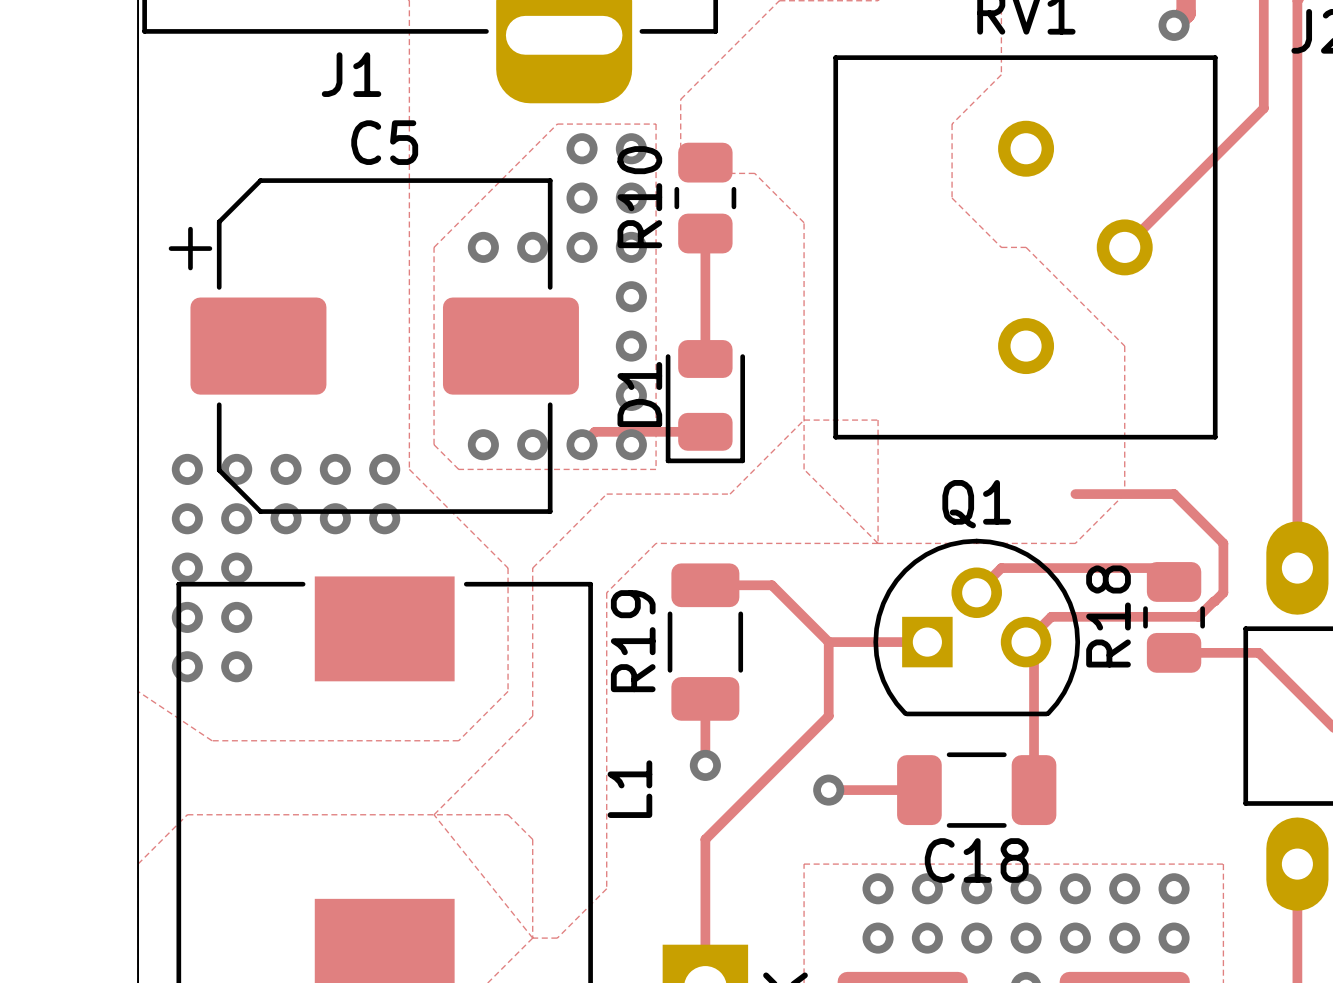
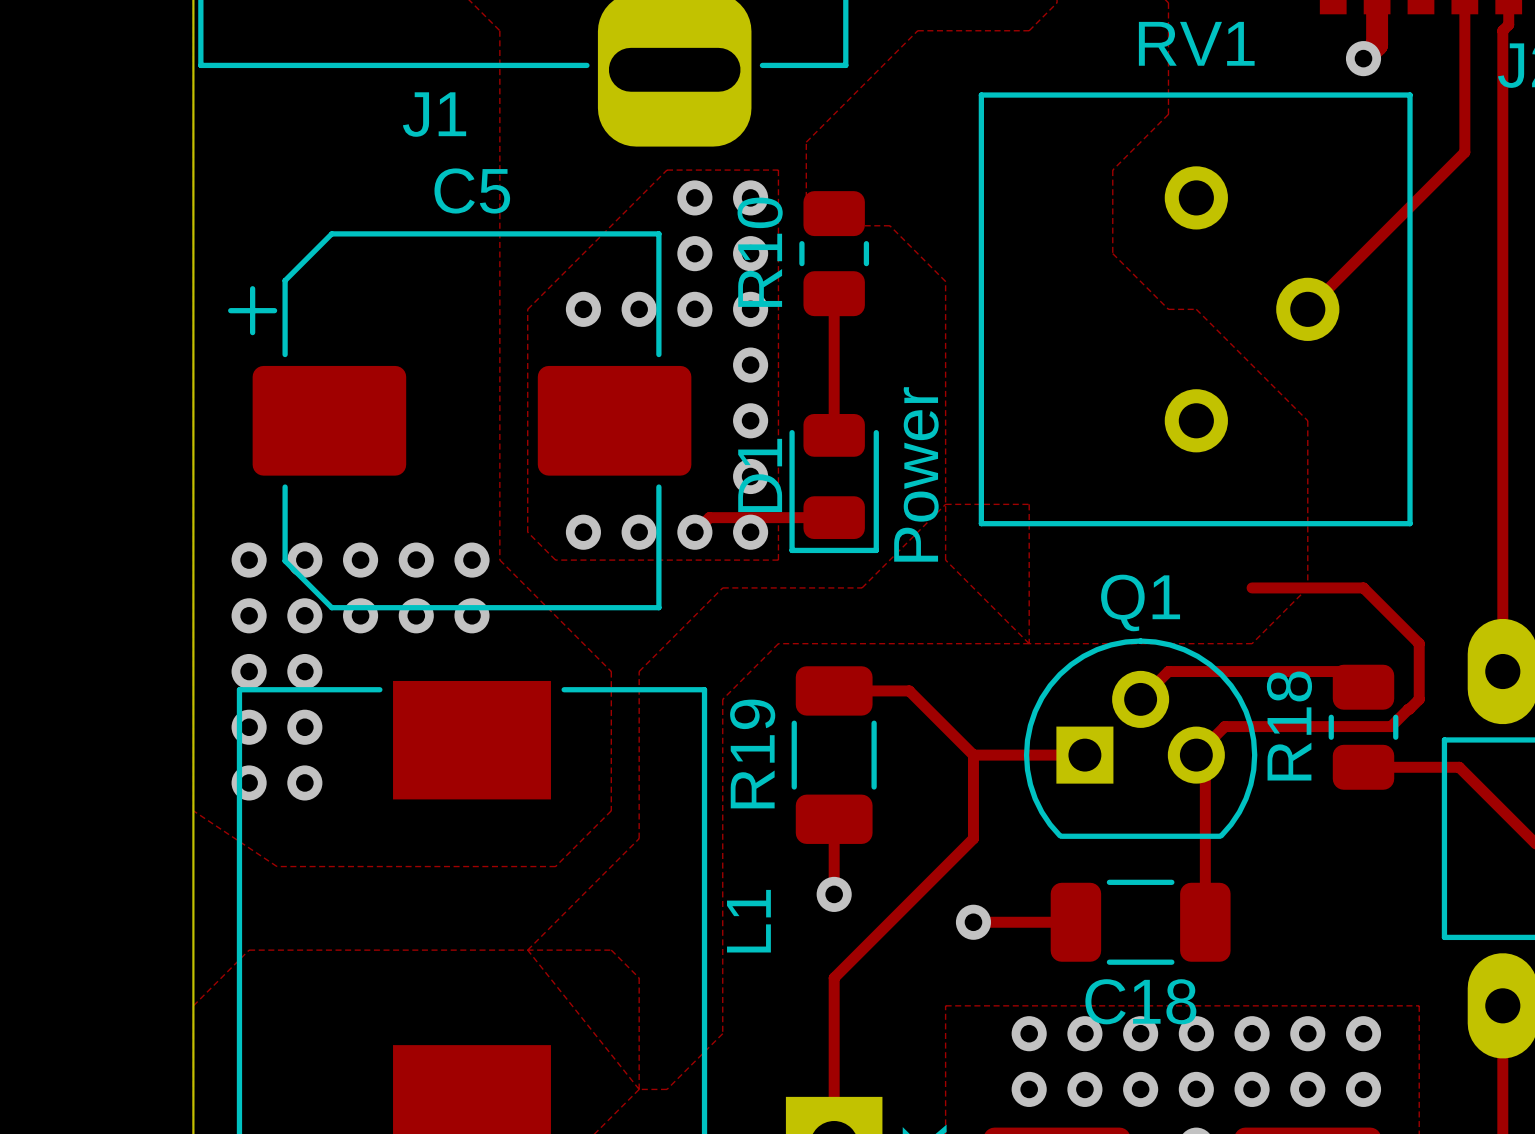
text: none -> Power (916, 474)

